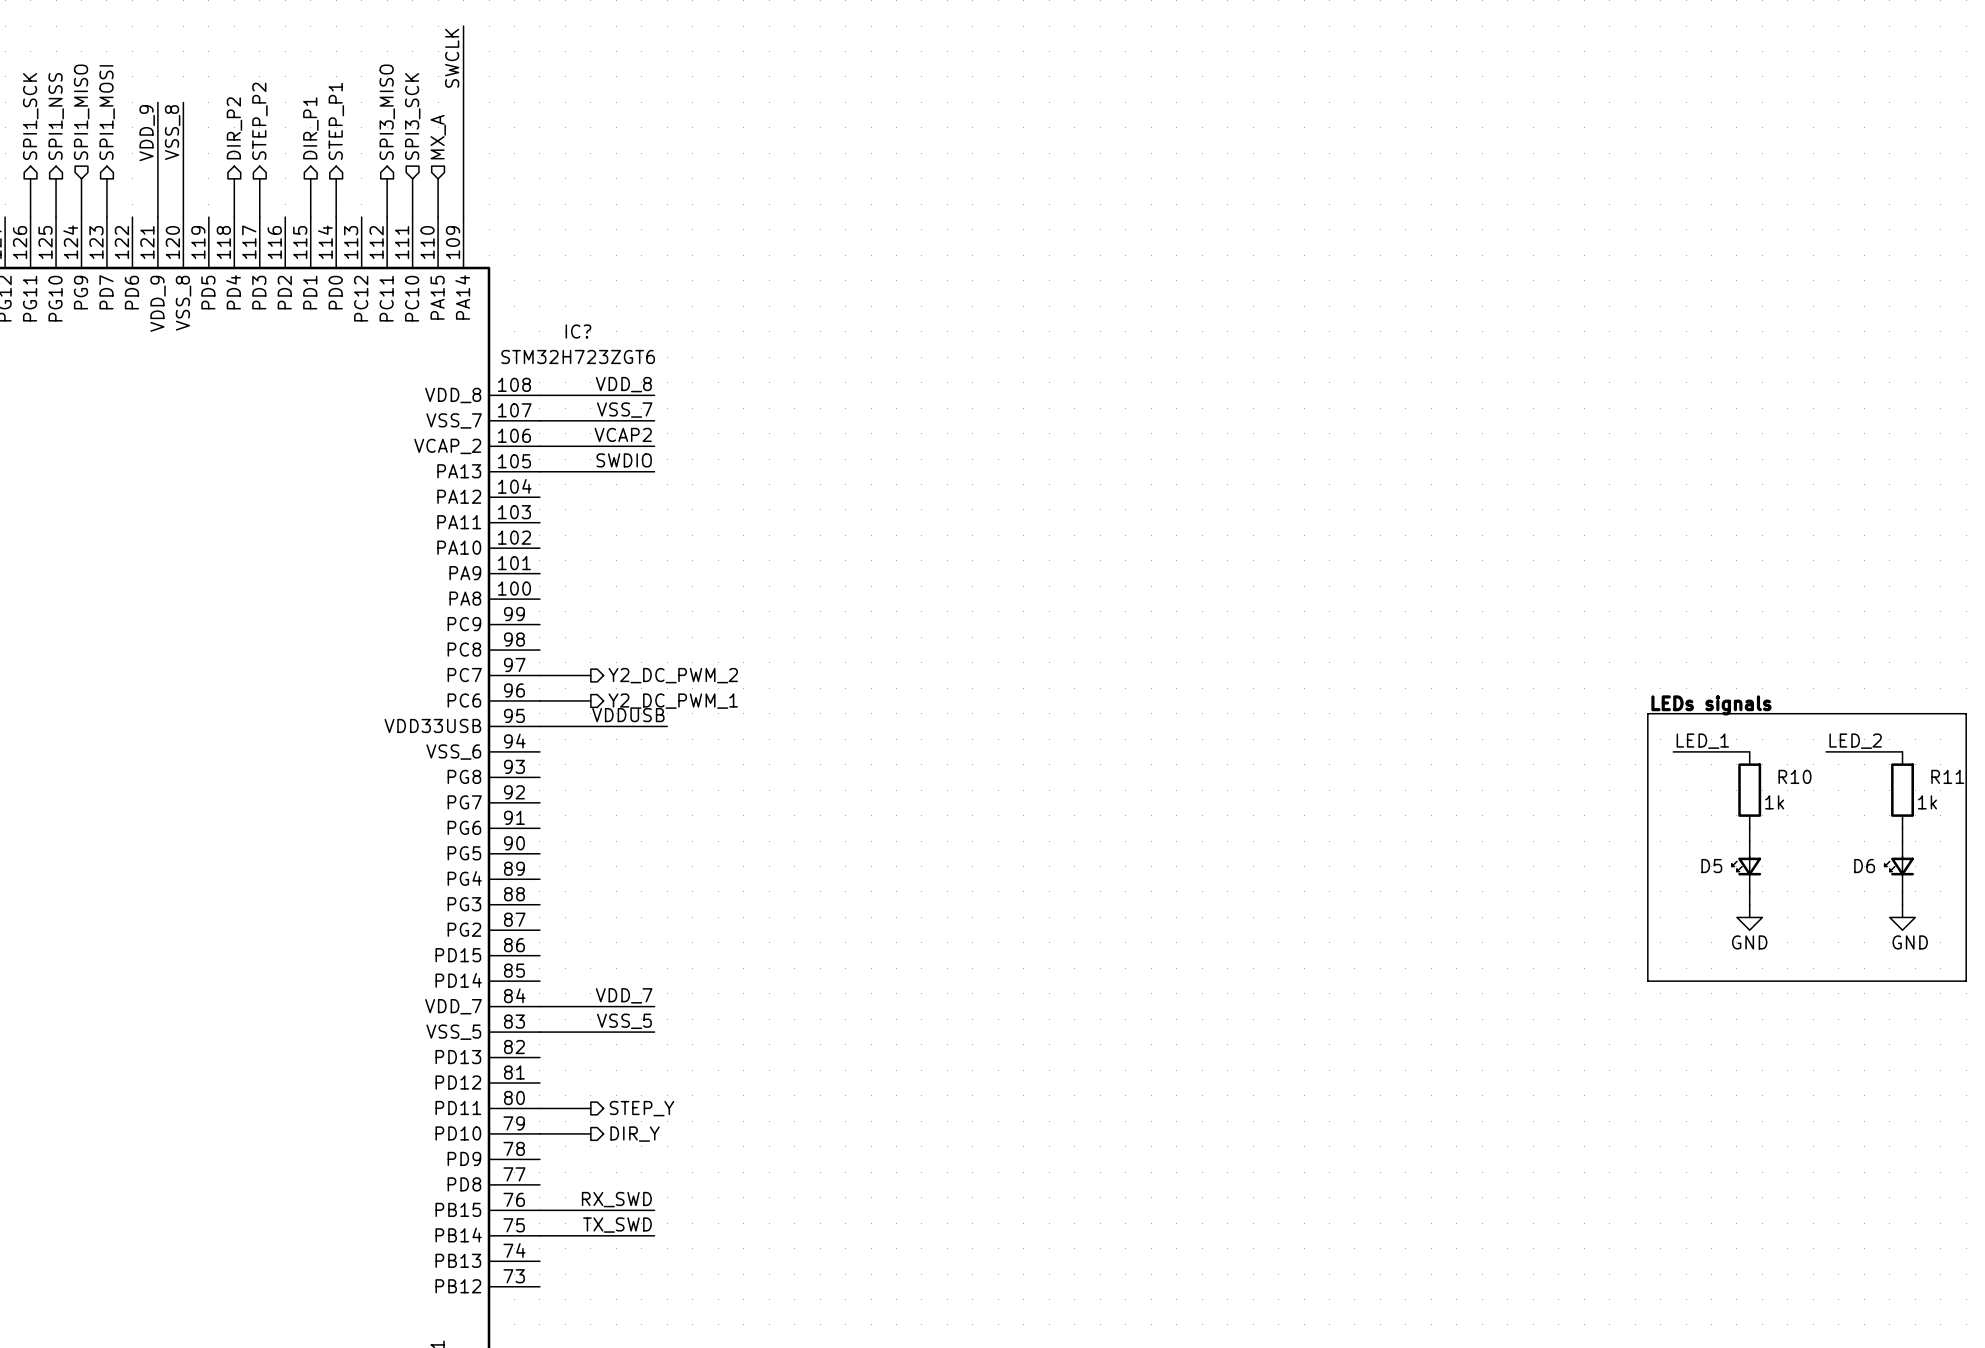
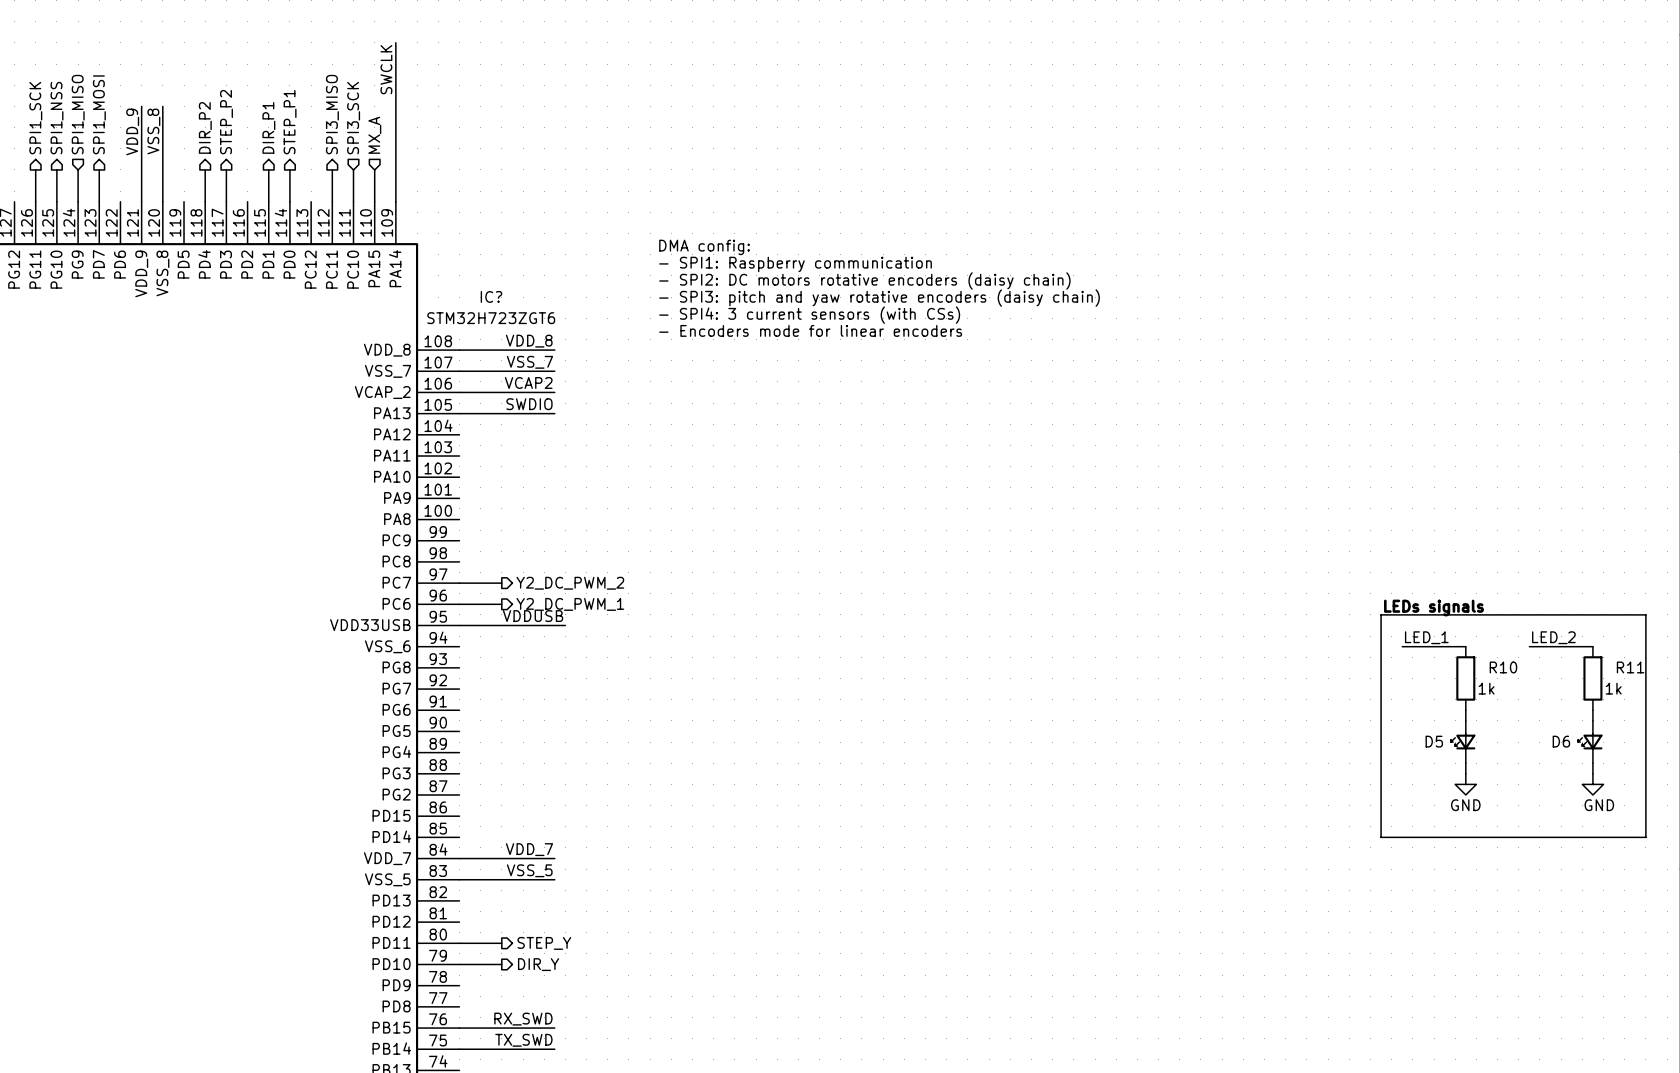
text: none -> DMA config: (704, 247)
text: none -> - SPI1: Raspberry communication (795, 264)
text: none -> - SPI2: DC motors rotative encoders (daisy chain) (864, 281)
text: none -> - SPI3: pitch and yaw rotative encoders (daisy chain) (879, 298)
text: none -> - SPI4: 3 current sensors (with CSs) (809, 315)
text: none -> - Encoders mode for linear encoders (810, 330)

